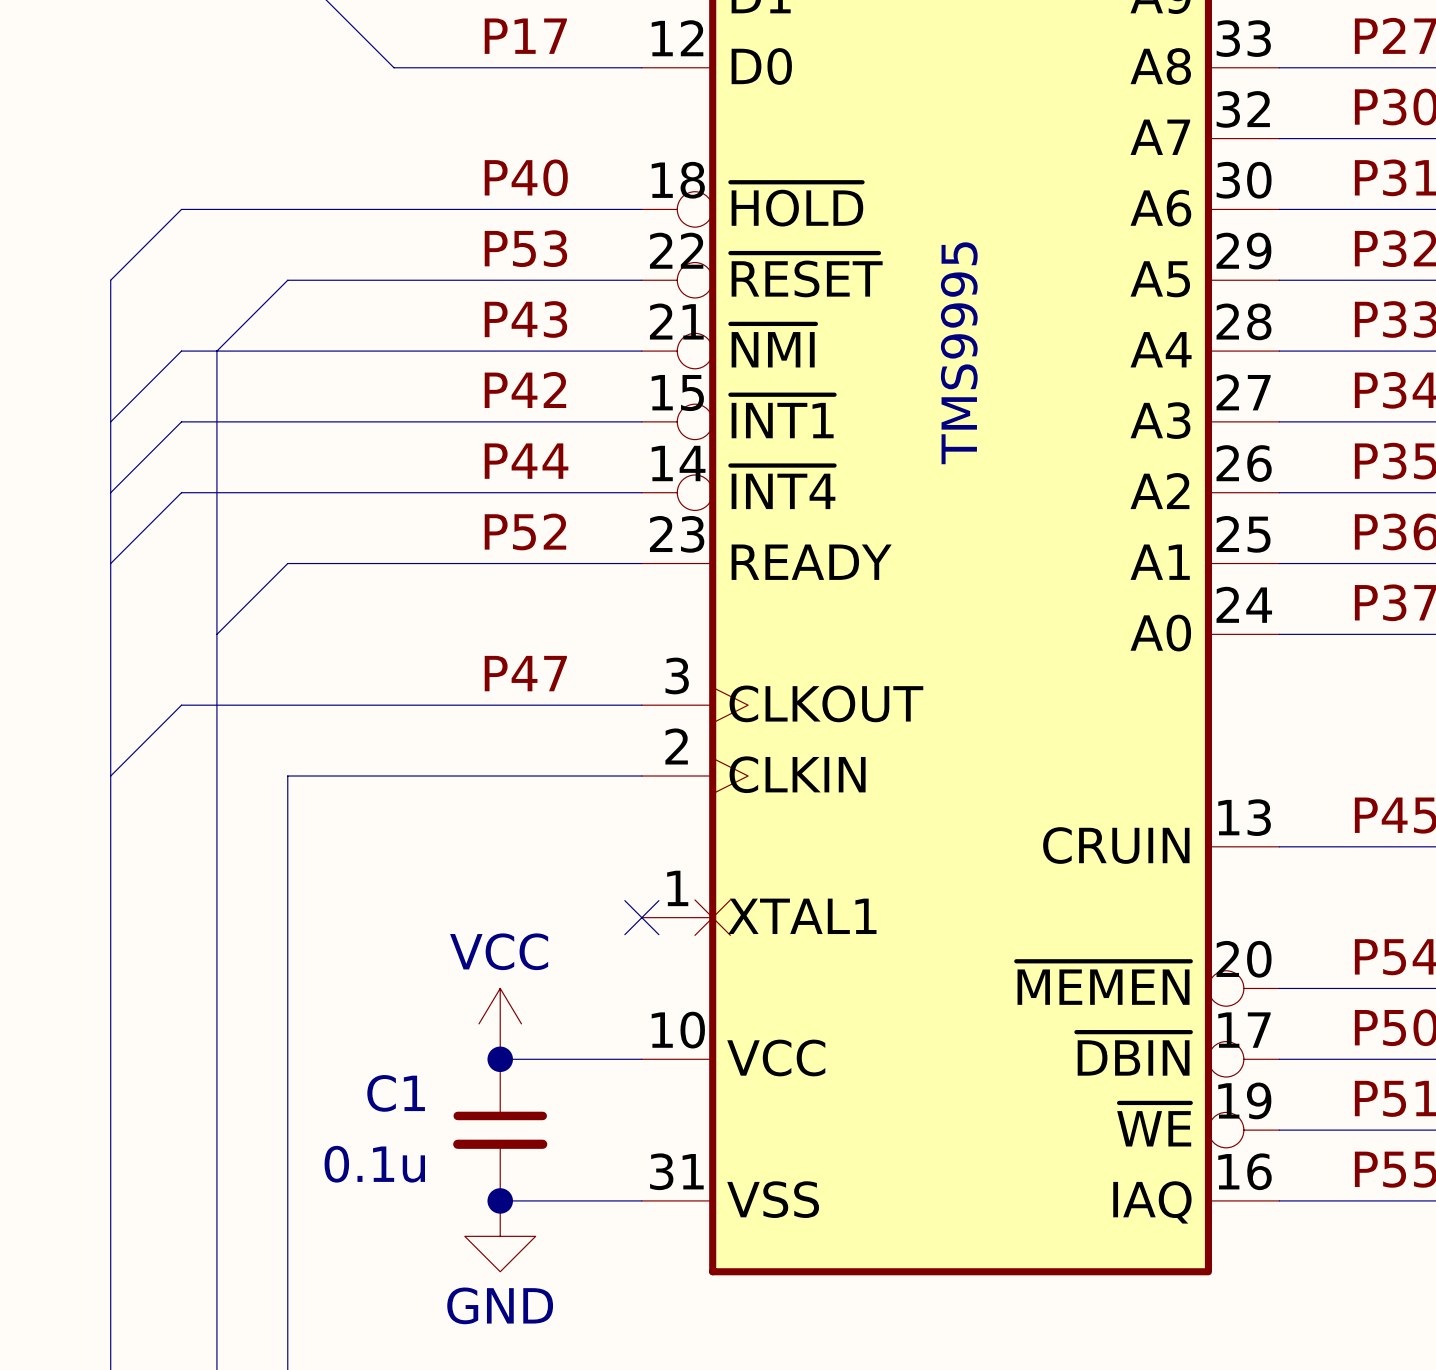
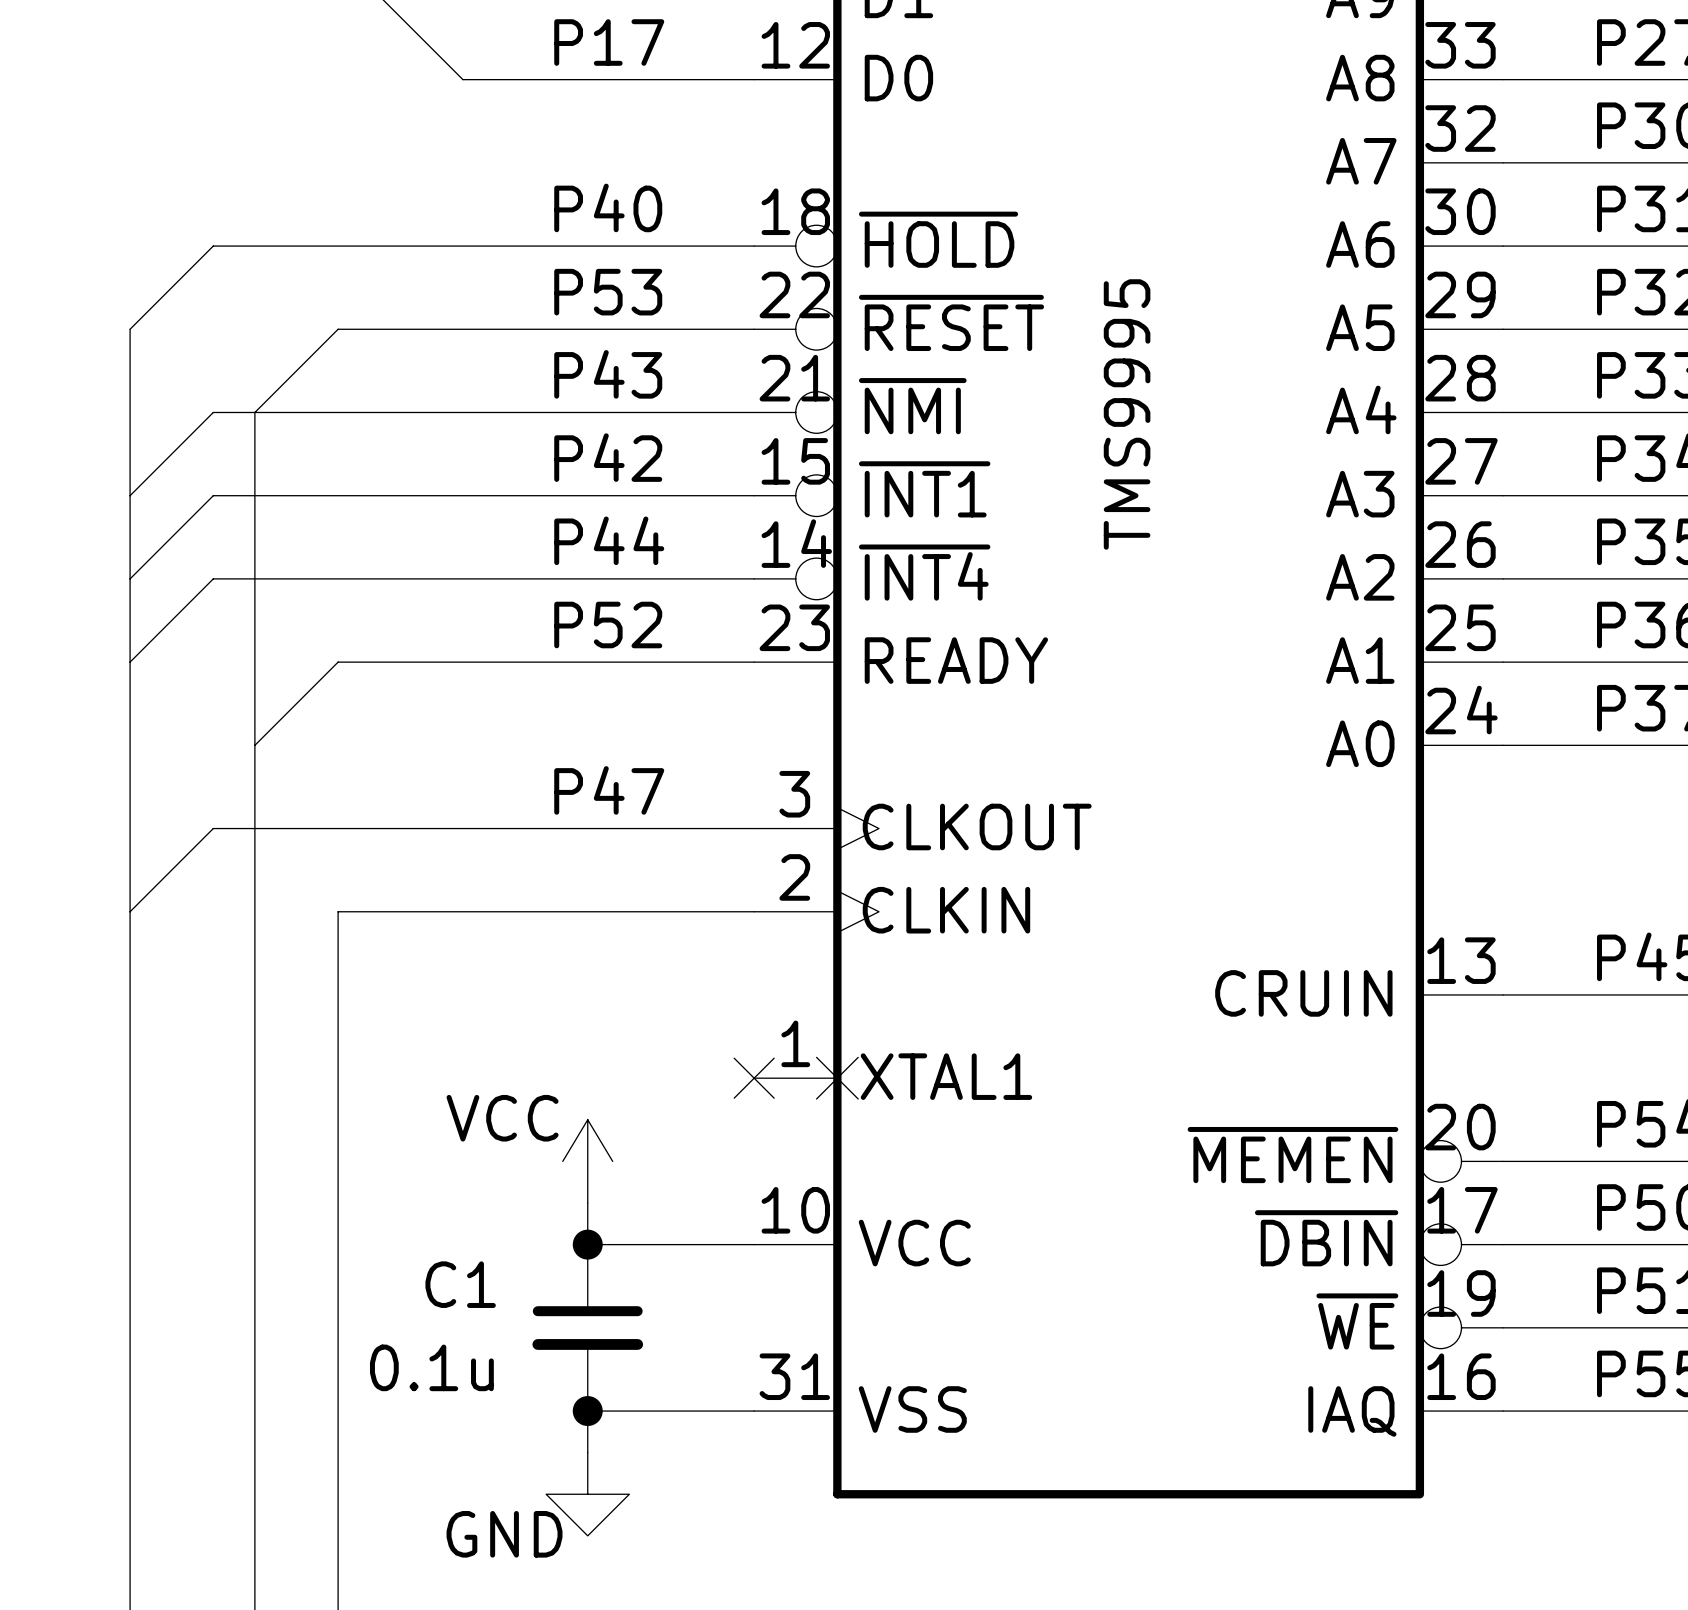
power symbol text position: VCC (499, 951) -> VCC (502, 1118)
power symbol position: VCC (500, 1023) -> VCC (587, 1161)
power symbol position: GND (500, 1236) -> GND (587, 1494)
power symbol text position: GND (500, 1305) -> GND (504, 1534)

